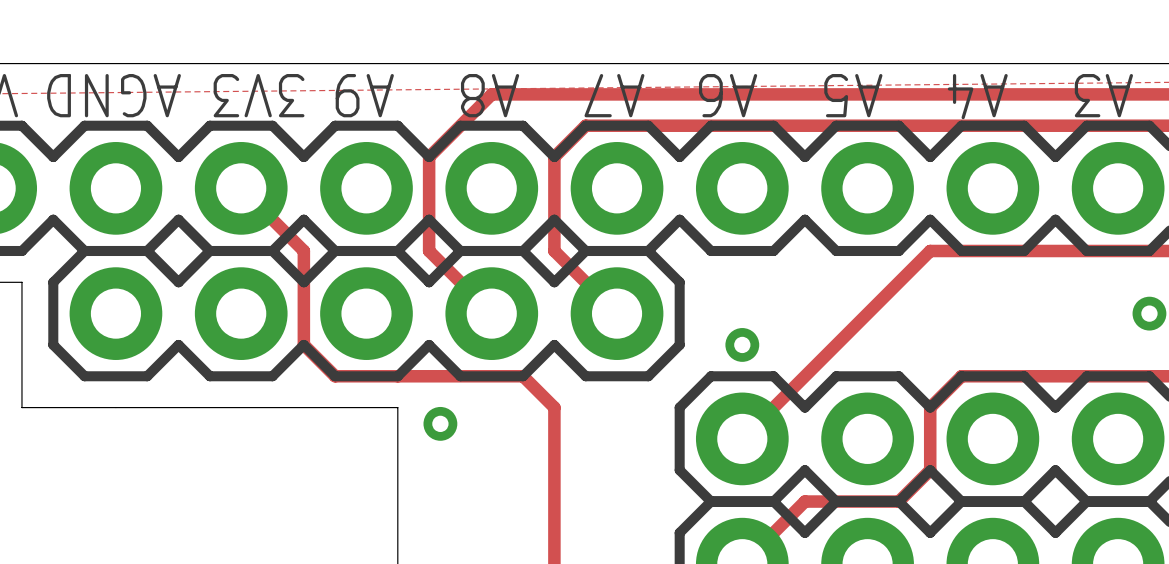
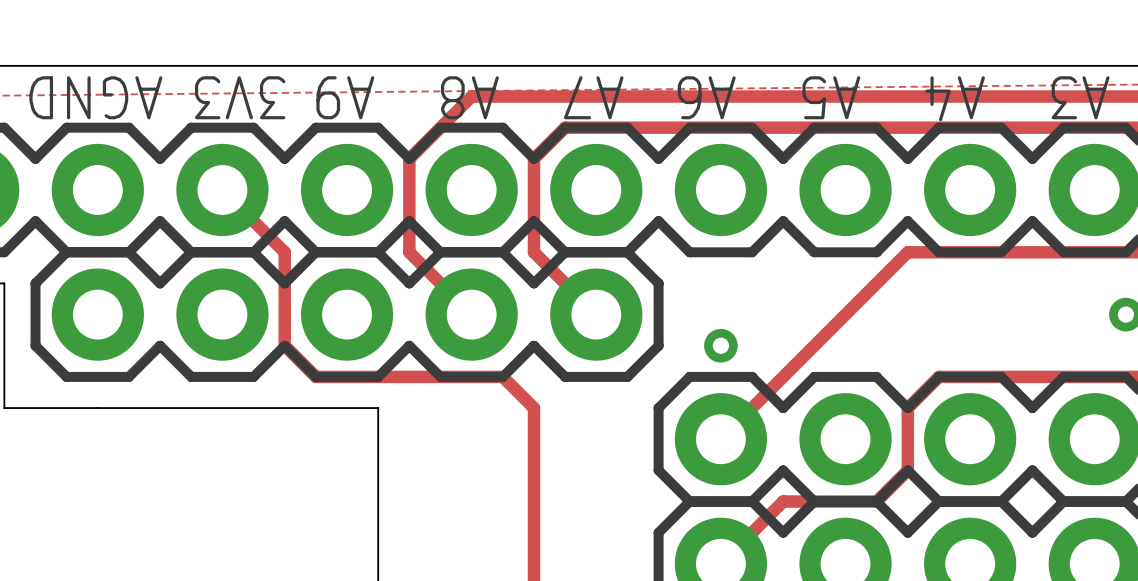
via: (440, 423) -> none

